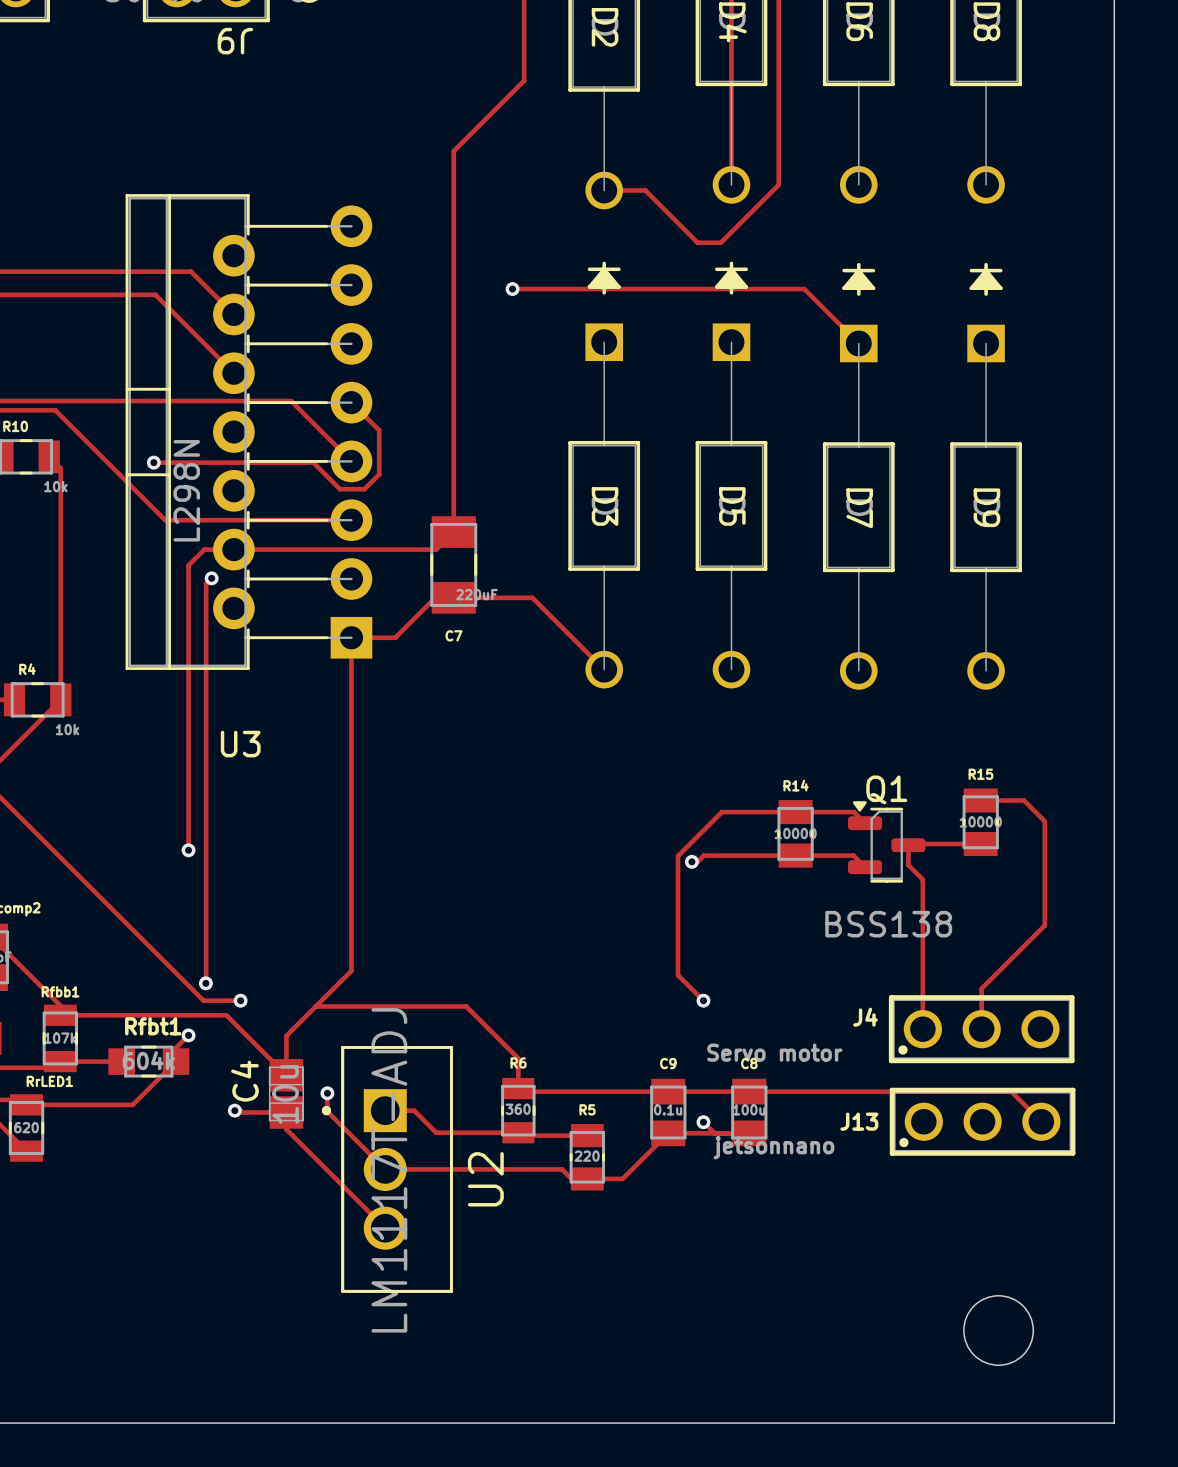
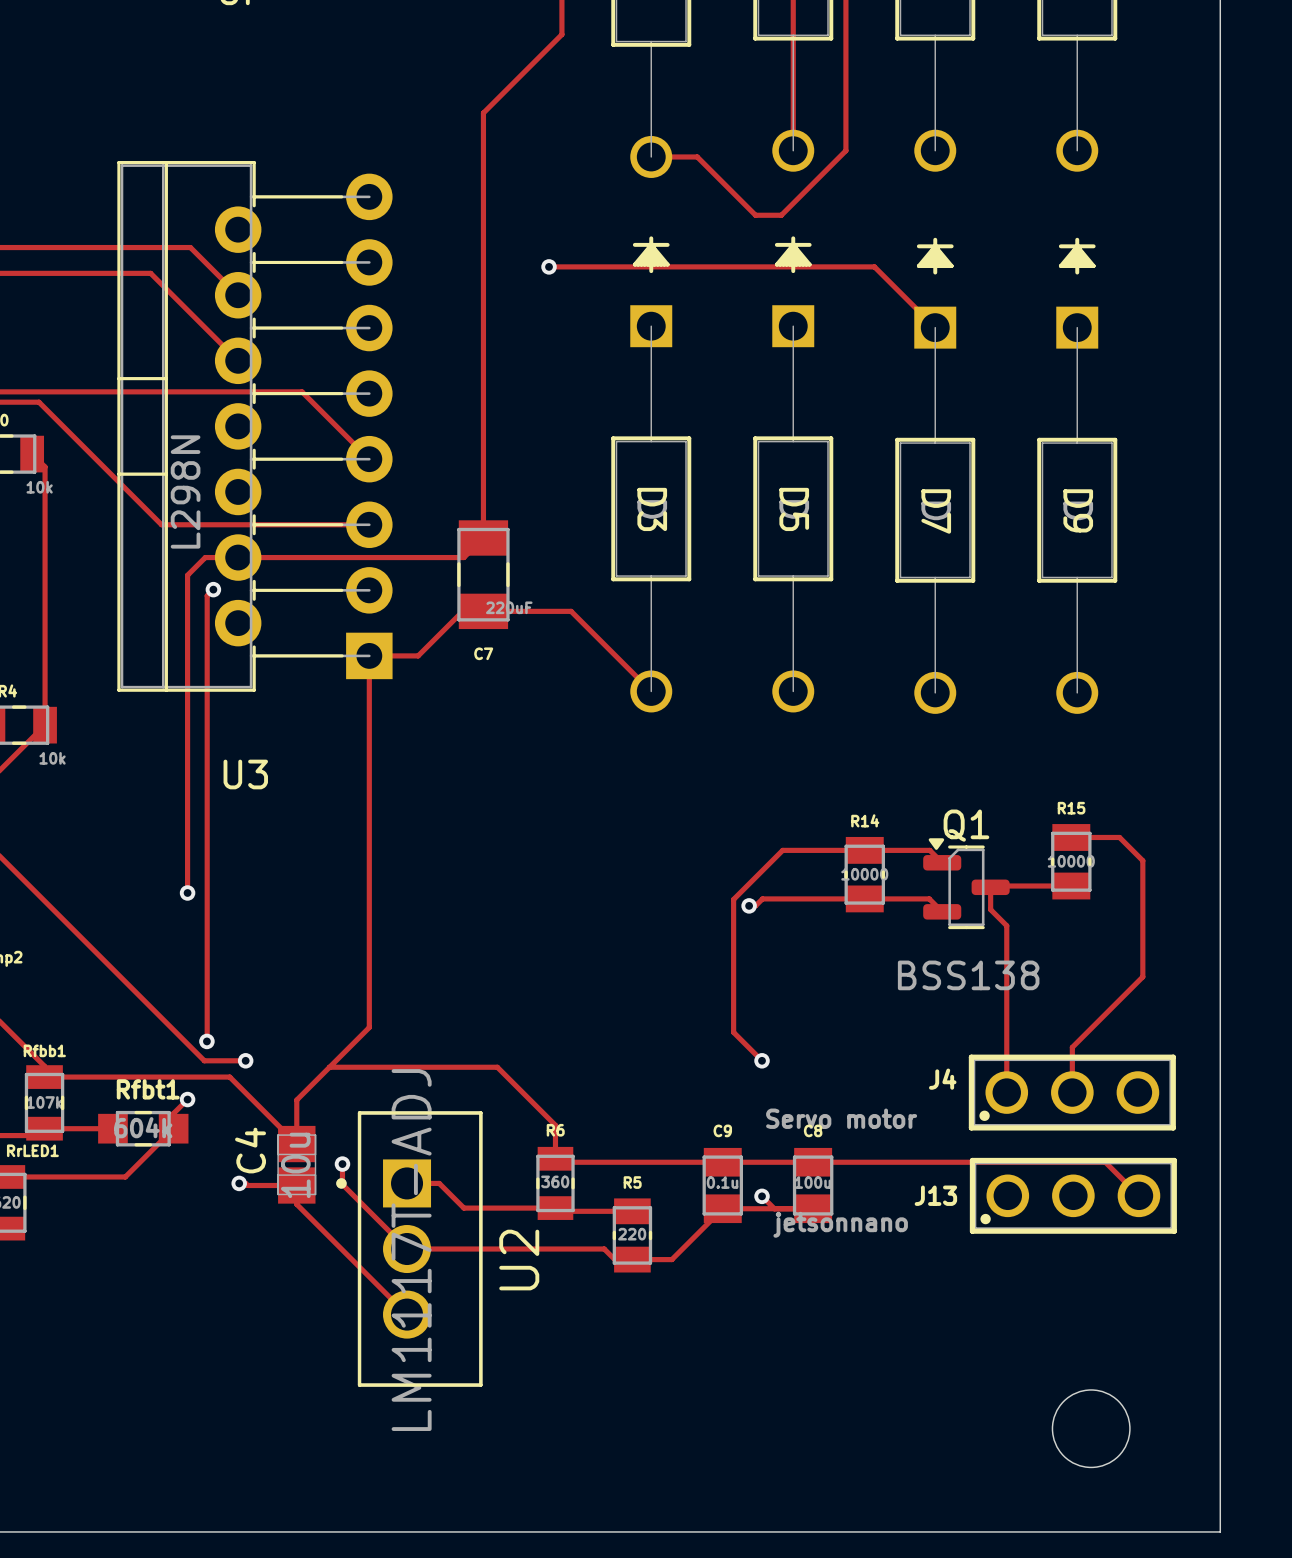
track: (351, 402) (379, 430) (379, 474) (364, 489) (339, 489) (313, 462) (153, 462) -> none
via: (153, 462) -> none

